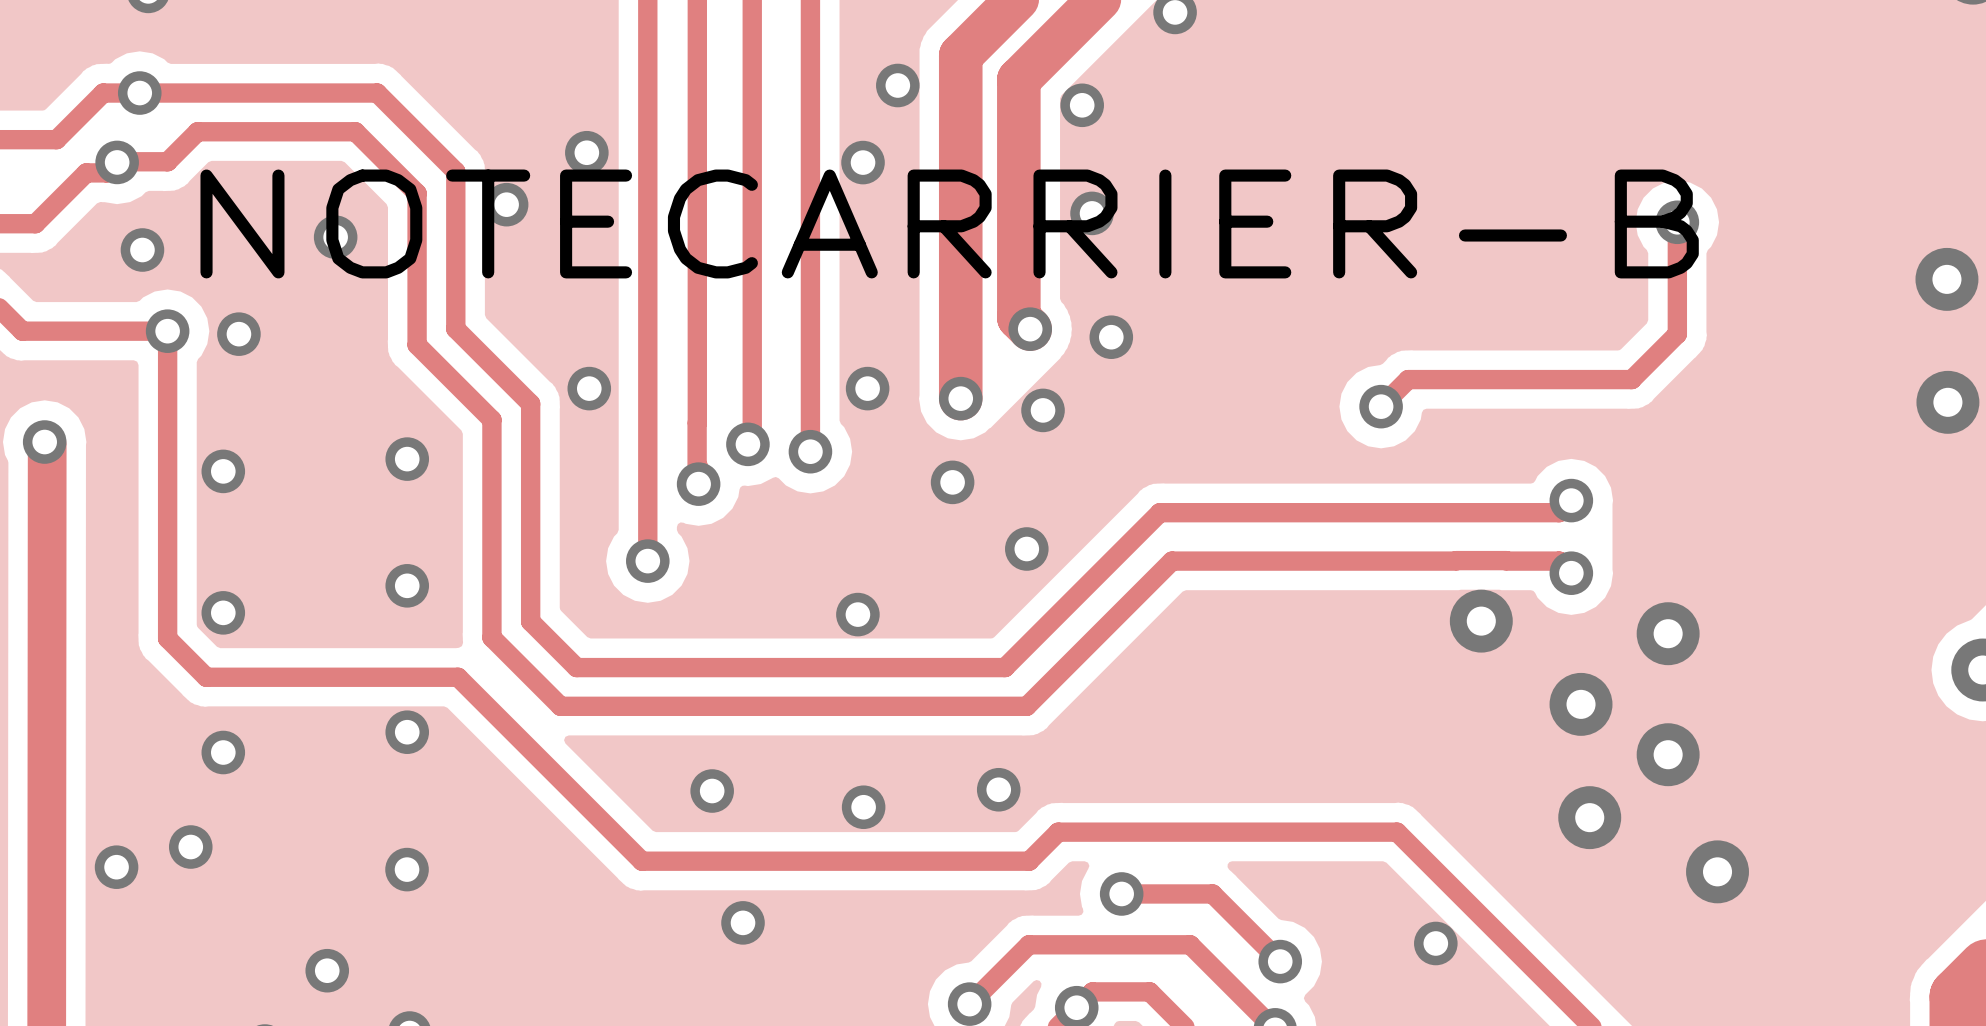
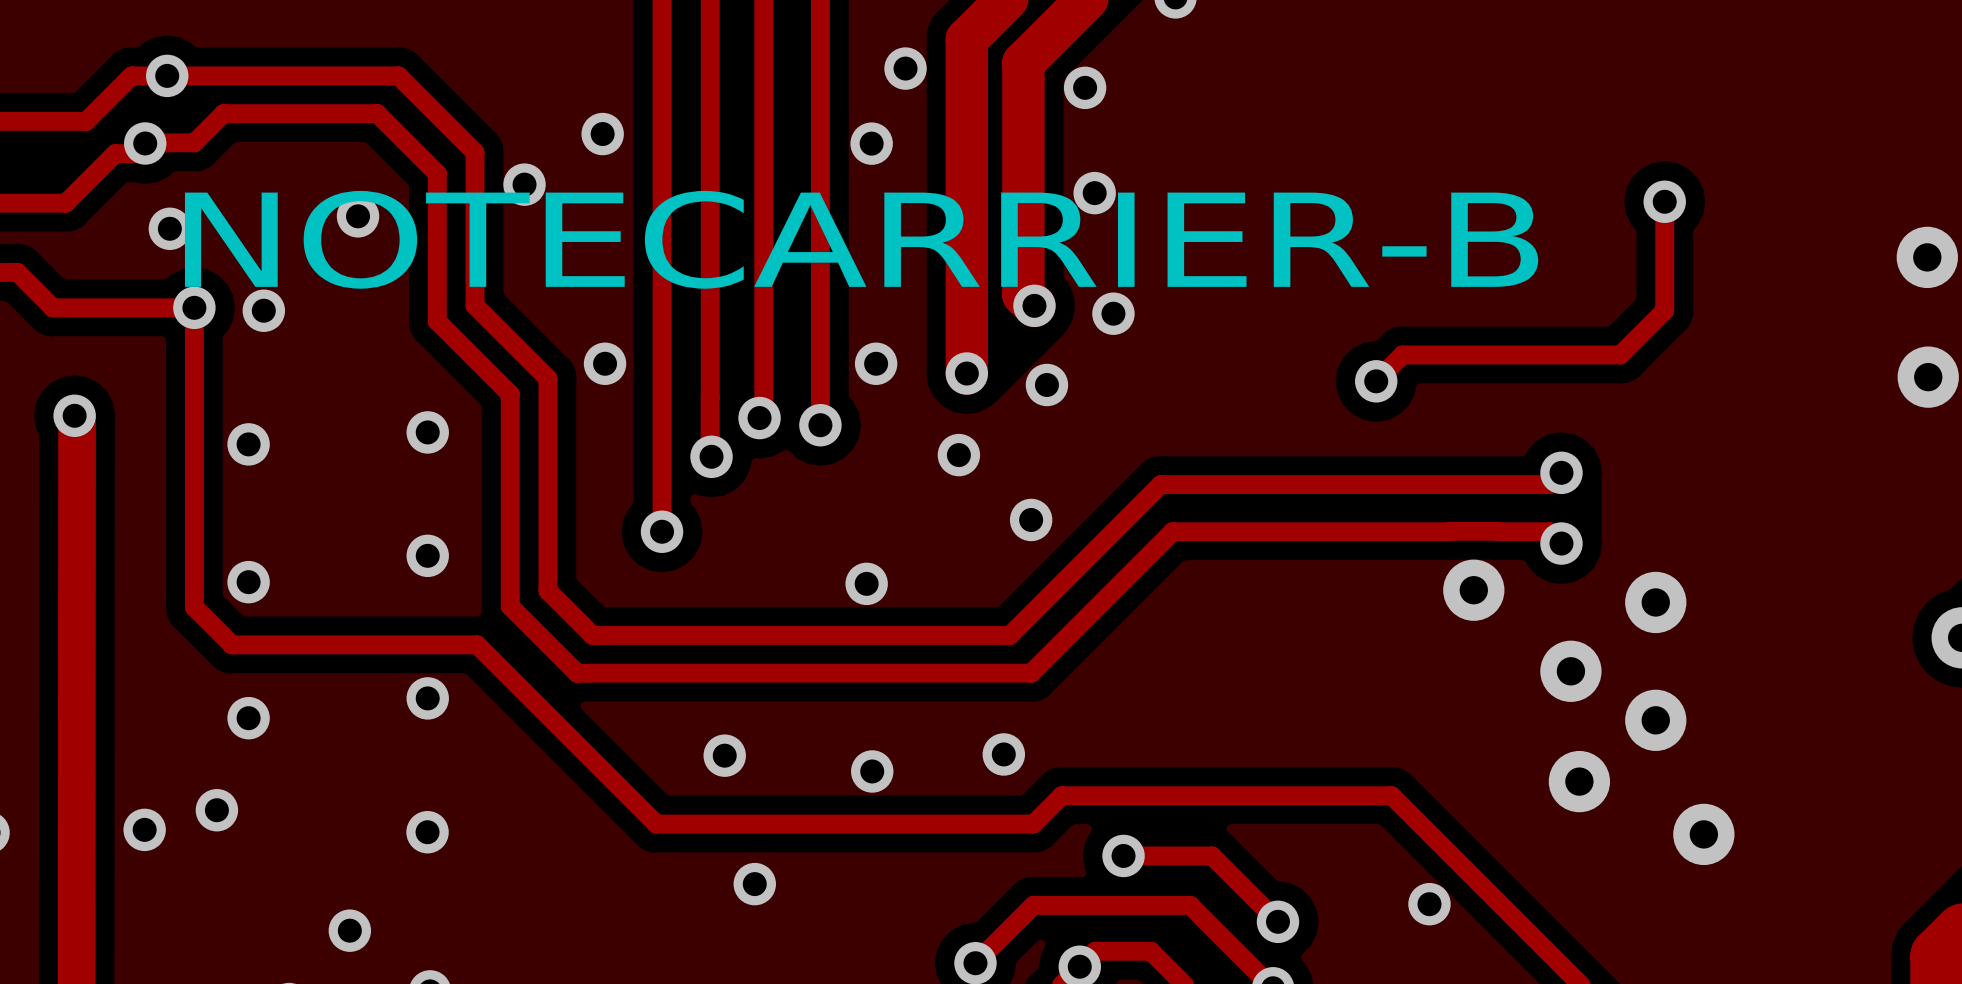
text position: NOTECARRIER-B (949, 223) -> NOTECARRIER-B (861, 239)

